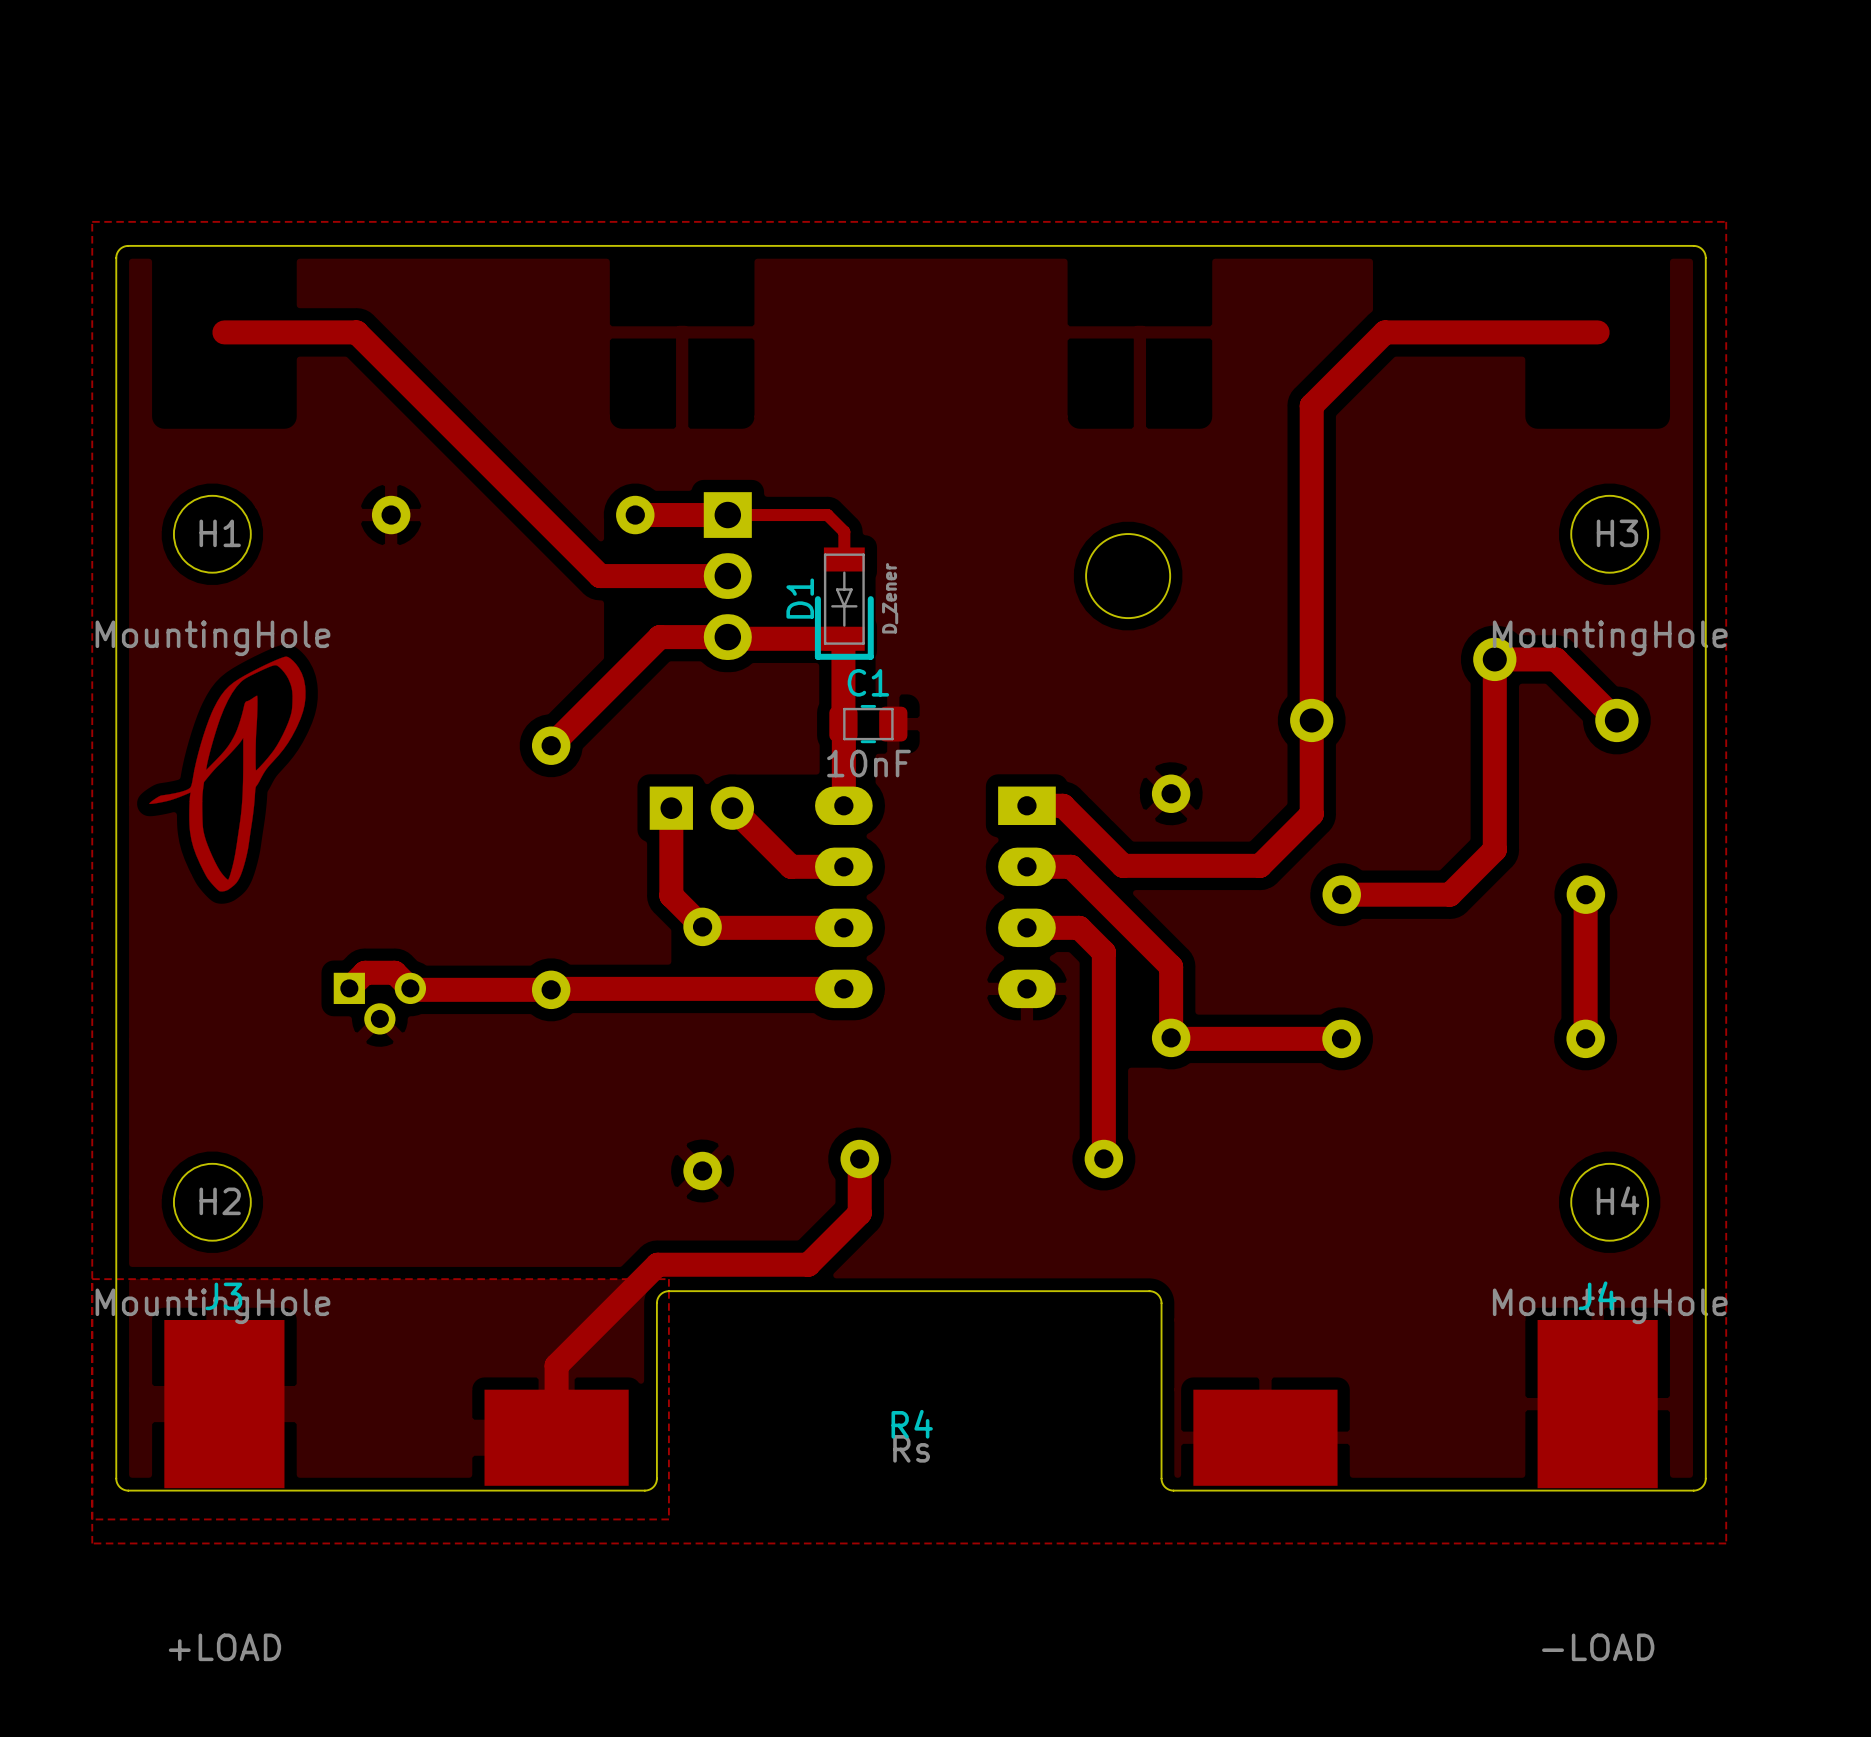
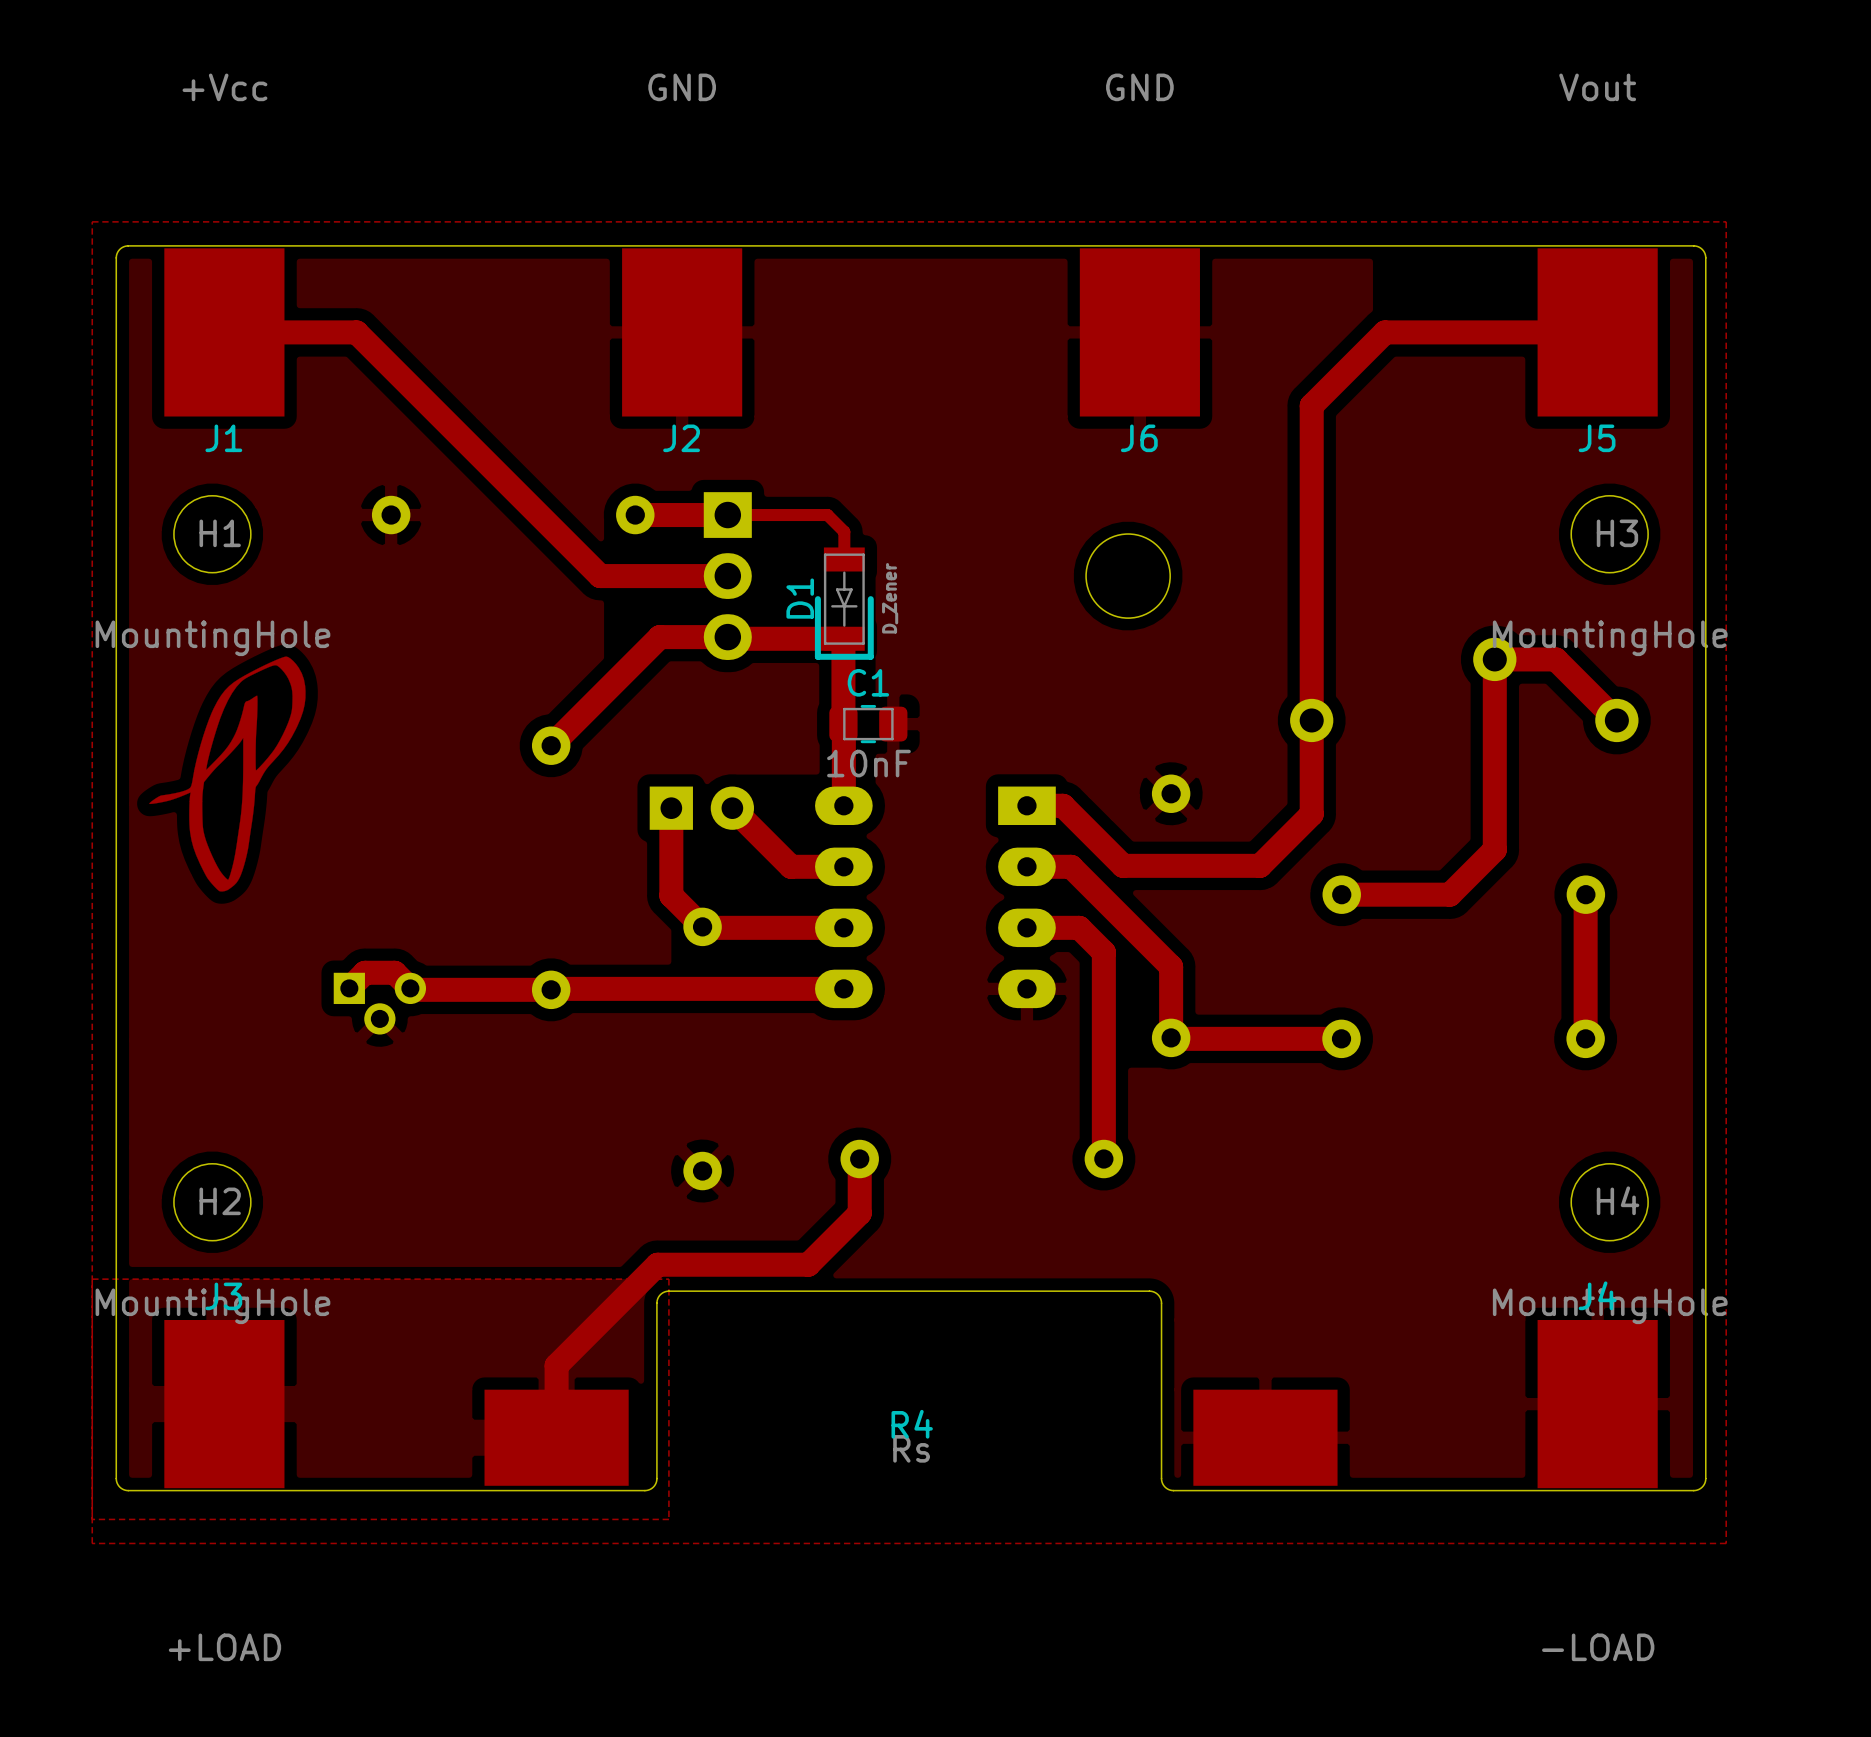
J1: none -> +Vcc (224, 332)
J2: none -> GND (682, 332)
J6: none -> GND (1139, 332)
J5: none -> Vout (1597, 332)

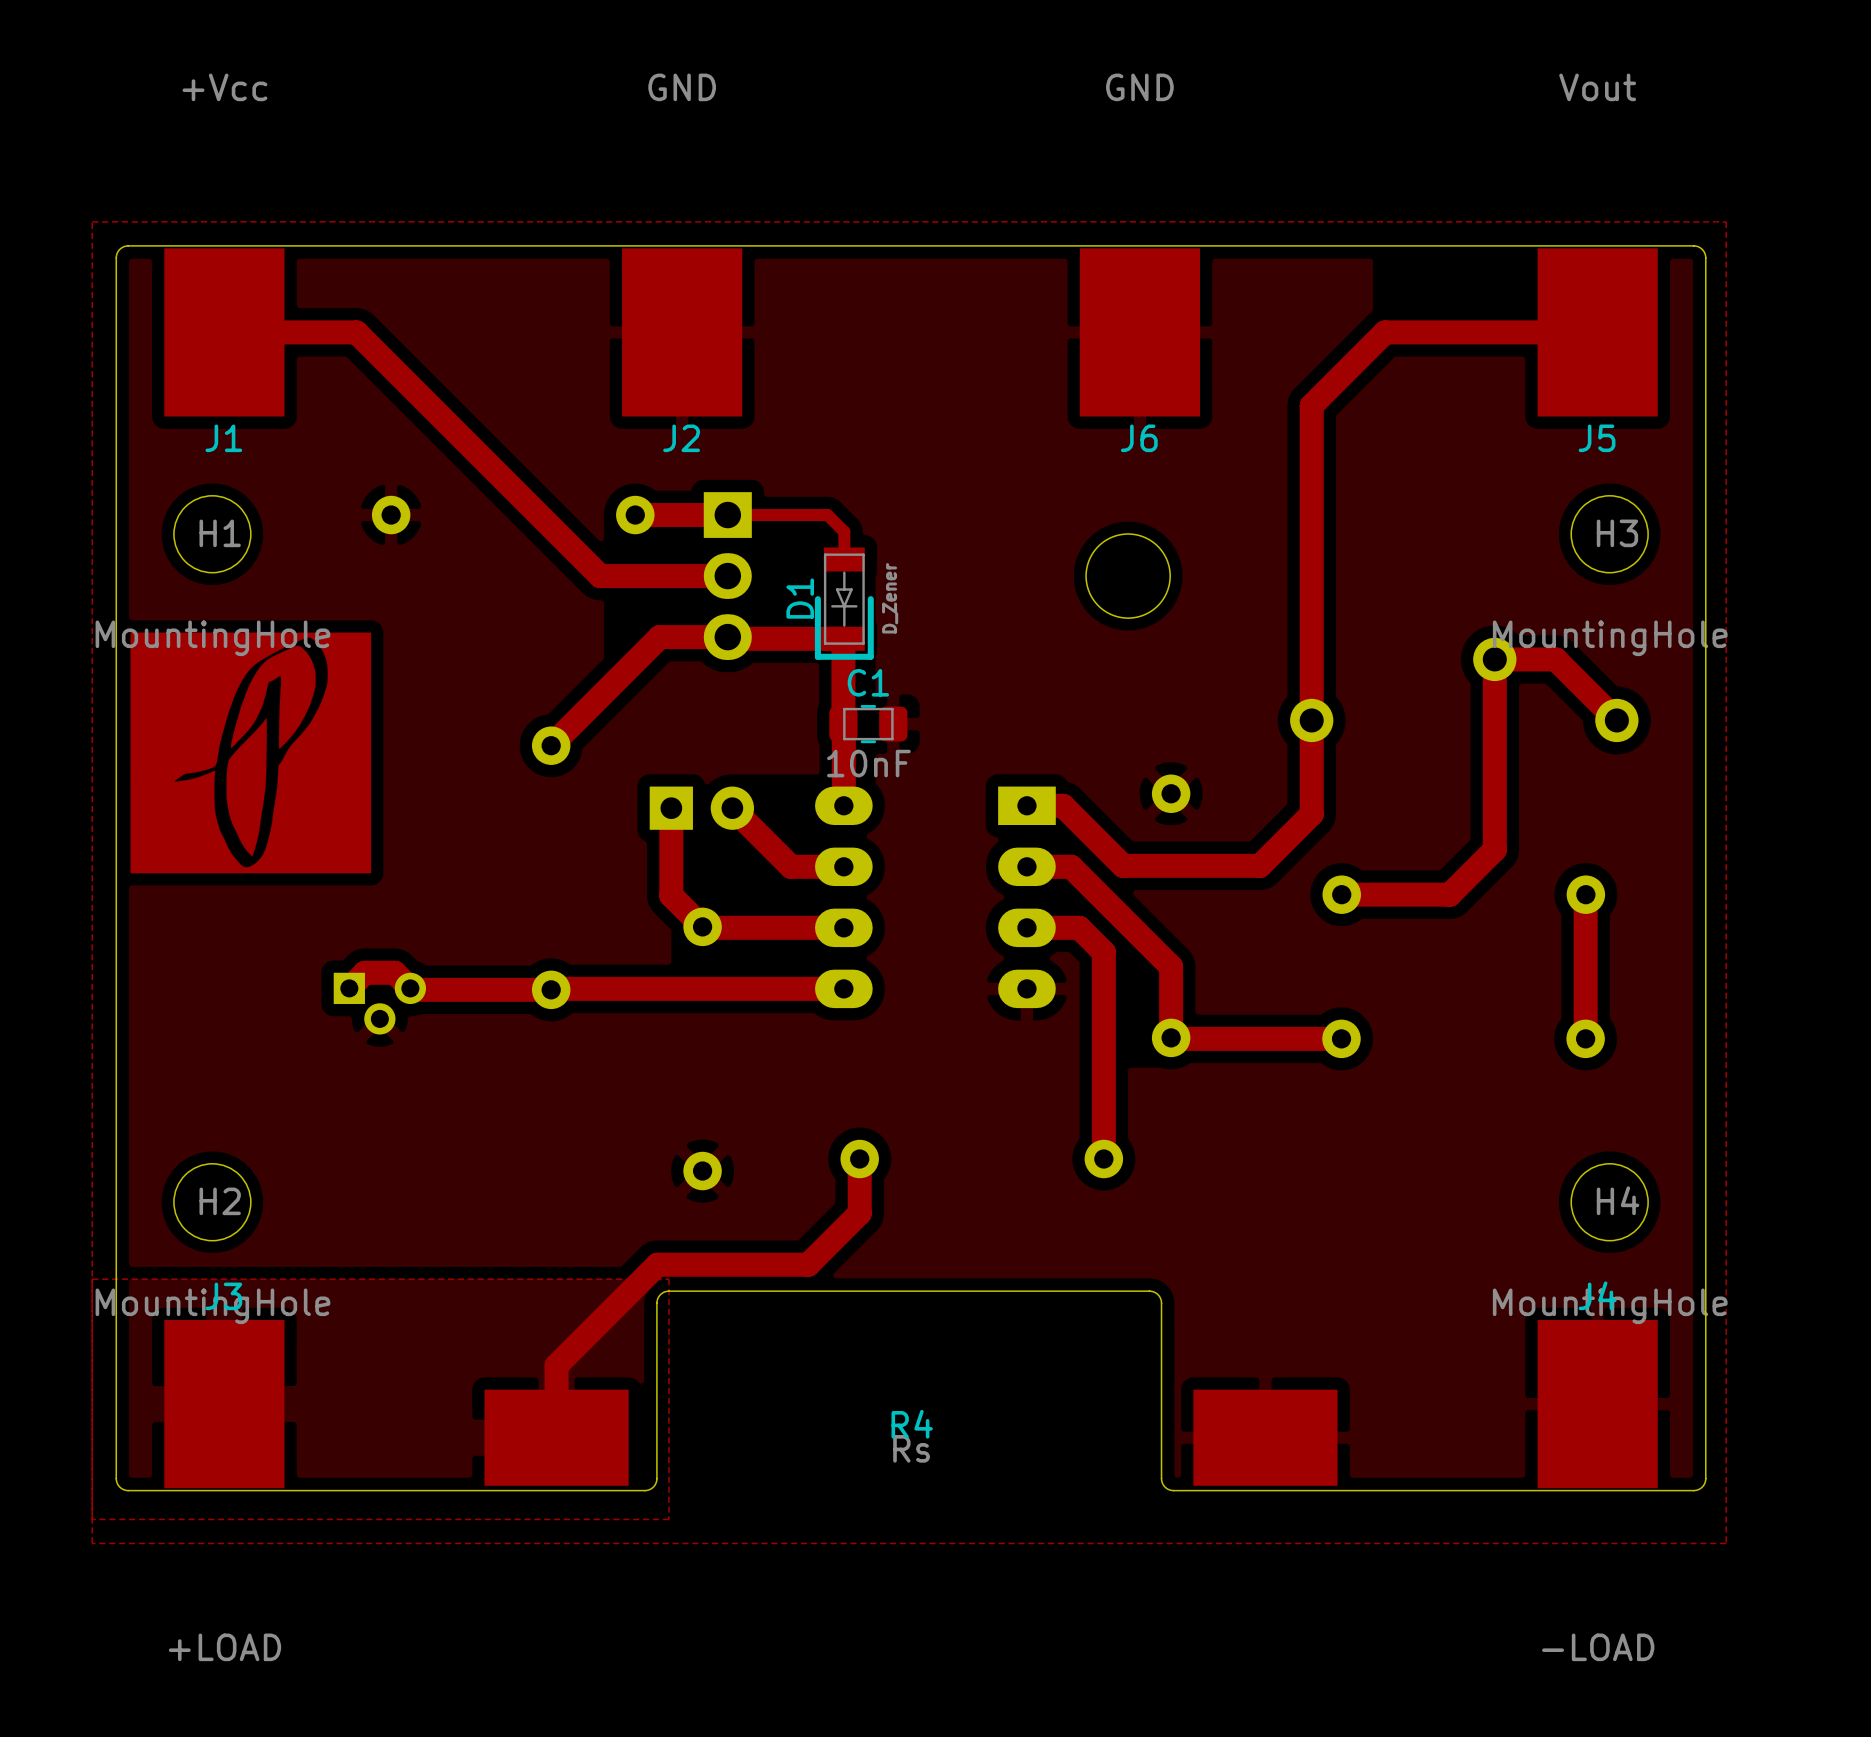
drawing: none -> [130, 632, 372, 874]
drawing: [149, 656, 306, 892] -> none

